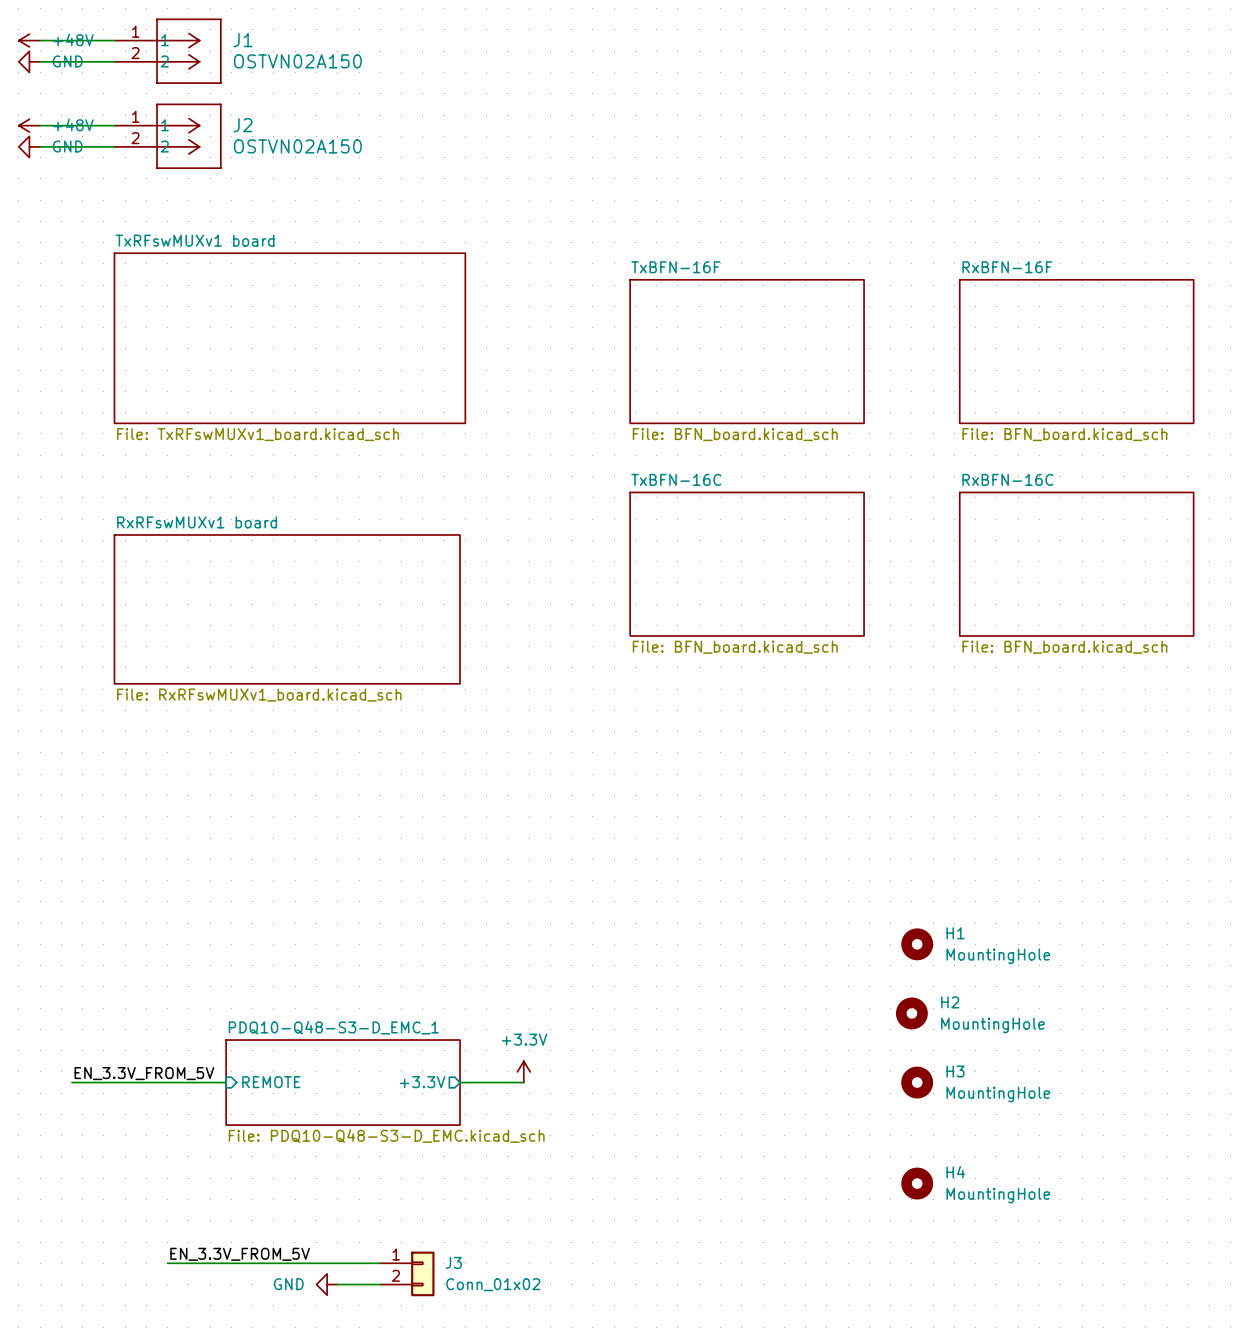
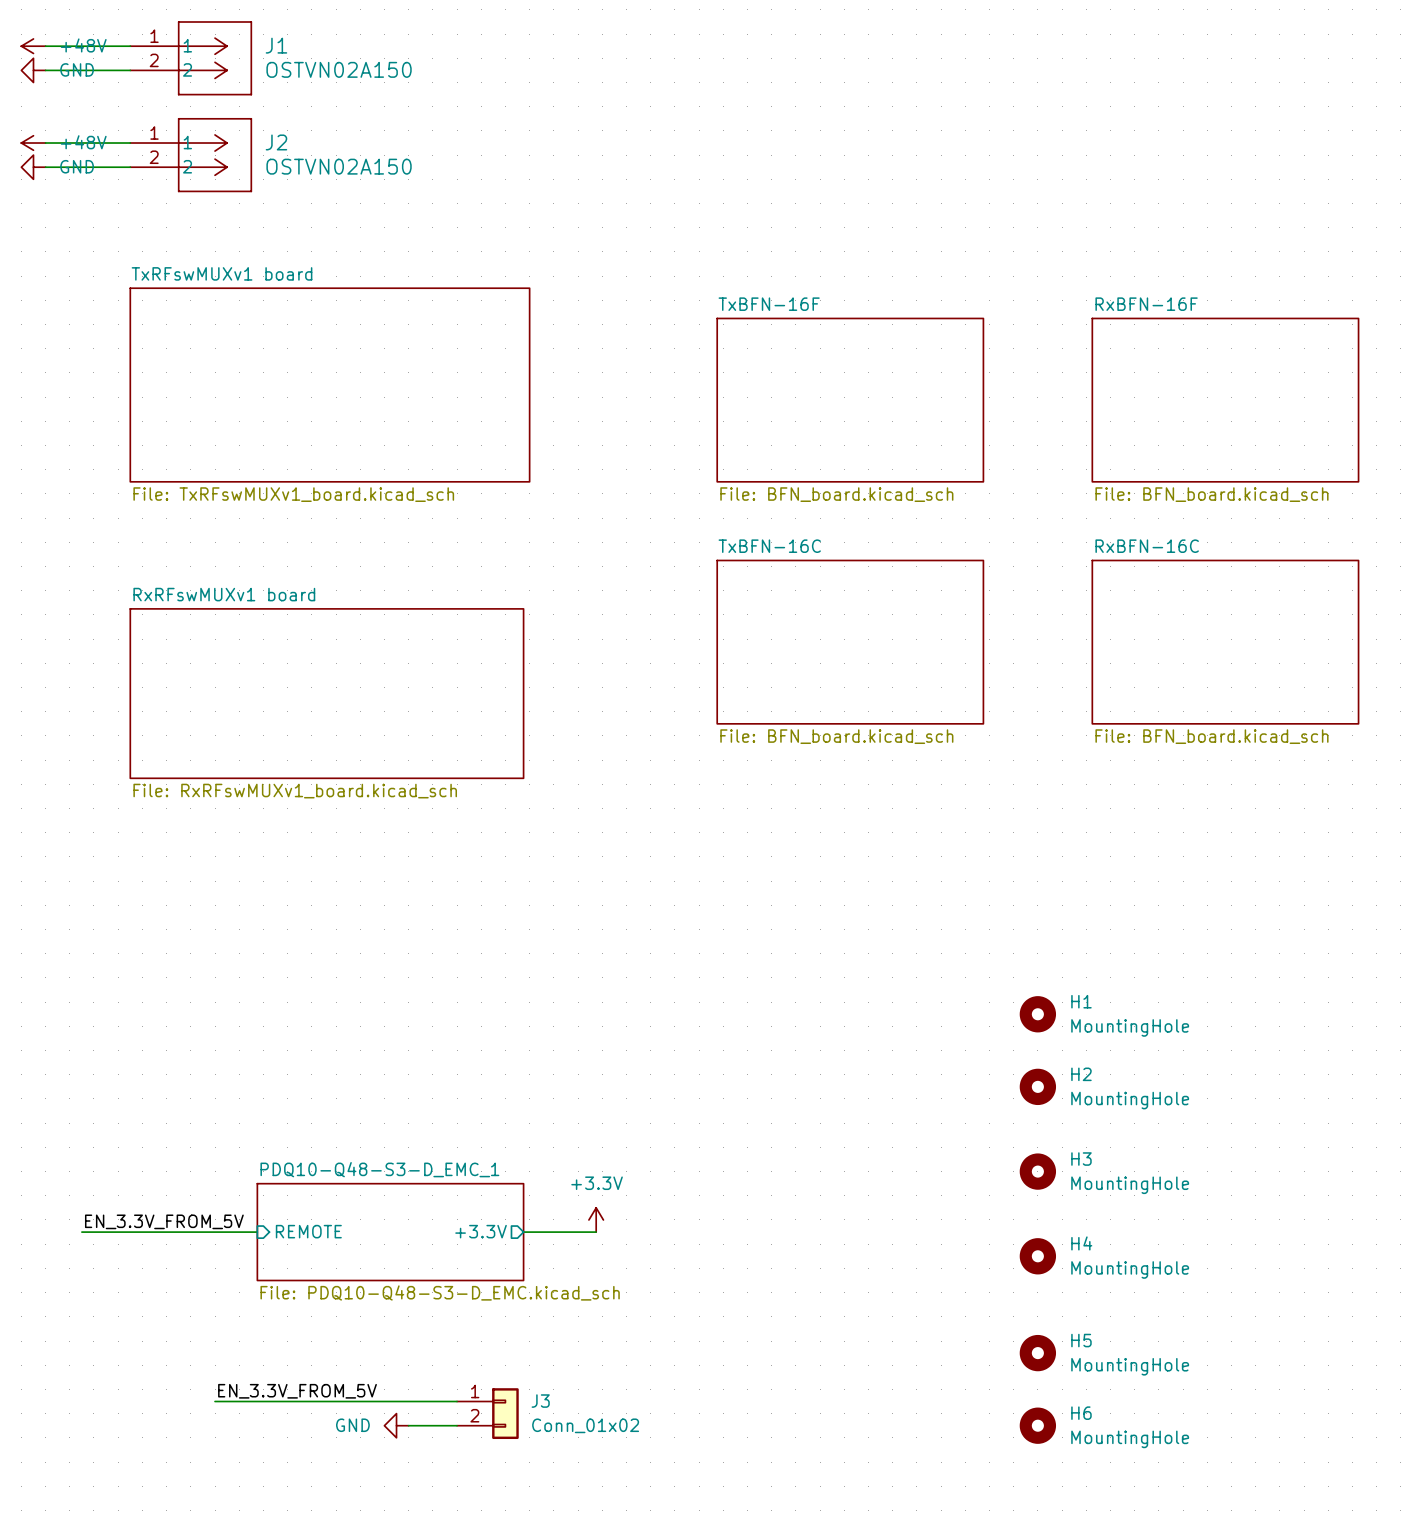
H1 position: (917, 944) -> (1037, 1014)
H2 position: (911, 1013) -> (1037, 1086)
H3 position: (917, 1082) -> (1037, 1171)
H4 position: (917, 1183) -> (1037, 1256)
H5: none -> MountingHole (1037, 1353)
H6: none -> MountingHole (1037, 1425)
label position: EN_3.3V_FROM_5V (240, 1254) -> EN_3.3V_FROM_5V (297, 1391)
wire: (167, 1263) (380, 1263) -> (215, 1401) (457, 1401)
J3 position: (407, 1273) -> (487, 1413)
power symbol position: GND (327, 1284) -> GND (396, 1425)
wire: (337, 1284) (380, 1284) -> (408, 1425) (457, 1425)

